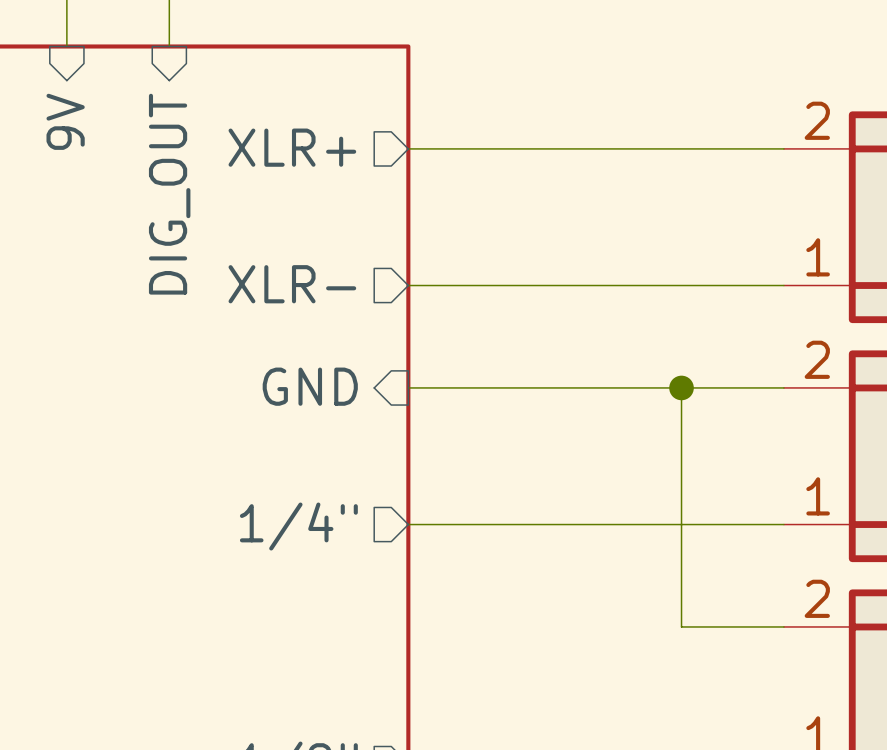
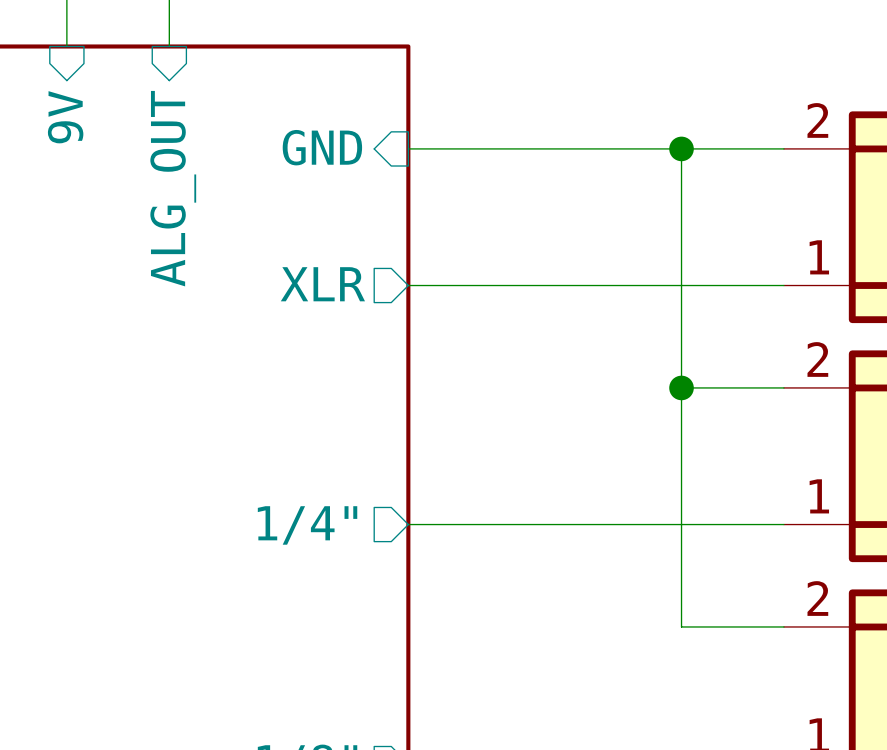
sheet pin shape: output (292, 147) -> input (322, 147)
sheet pin: XLR+ (292, 147) -> GND (322, 147)
junction: none -> (681, 148)
sheet pin: DIG_OUT (169, 194) -> ALG_OUT (173, 188)
sheet pin: XLR- (292, 284) -> XLR (322, 284)
sheet pin: GND (310, 386) -> none
wire: (408, 387) (681, 387) -> (681, 148) (681, 387)

